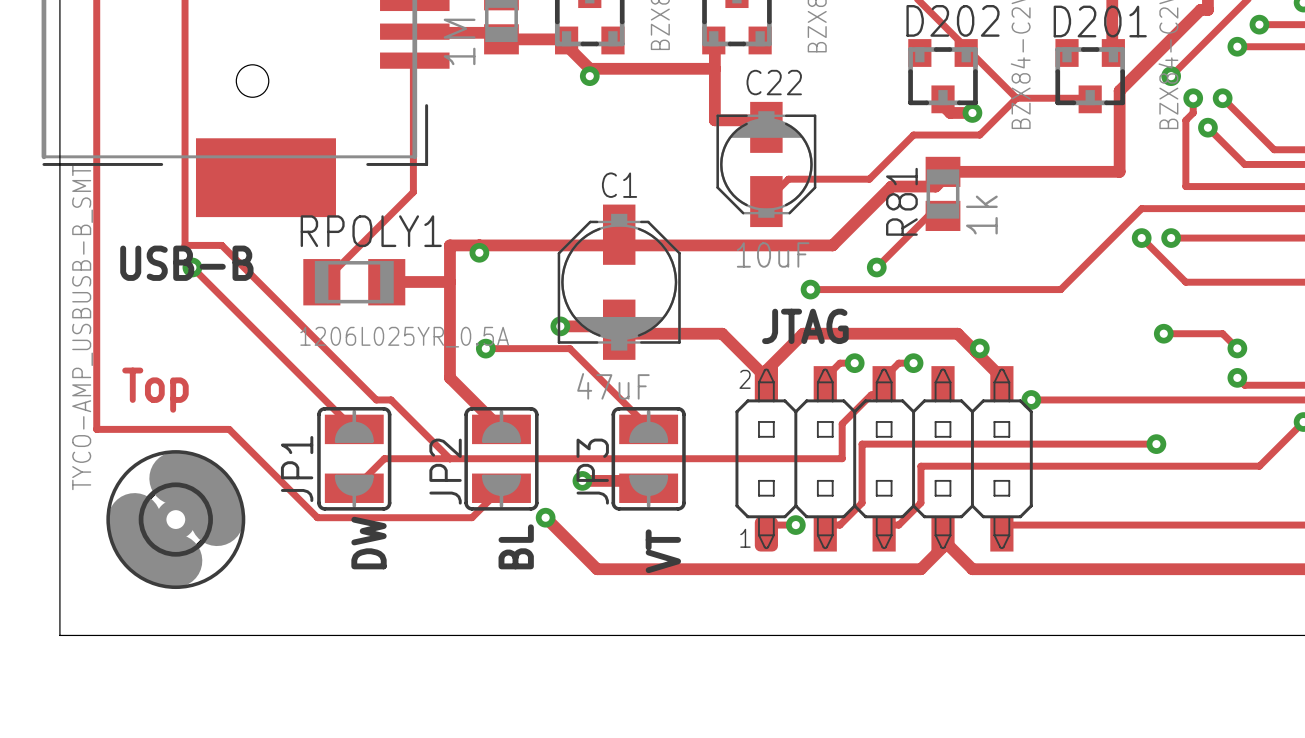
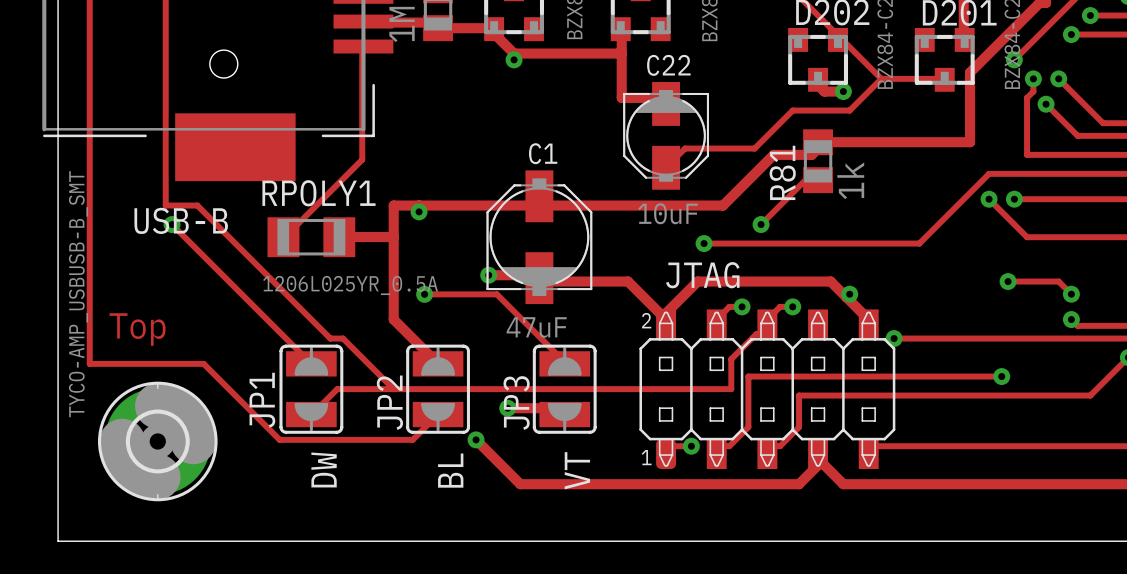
part footprint: [106, 450, 246, 590] -> [98, 381, 218, 502]

